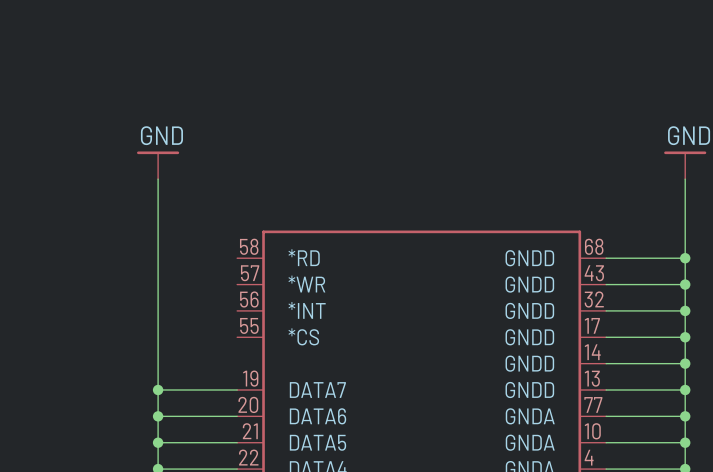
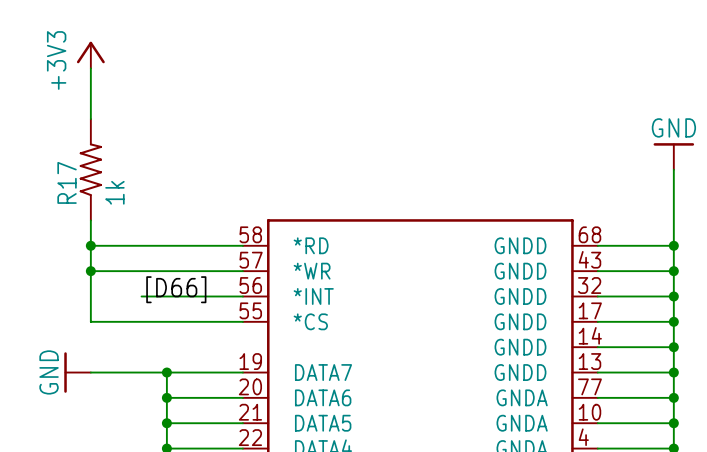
power symbol: none -> +3V3 (90, 55)
wire: none -> (90, 68) (90, 119)
power symbol rotation: 0° (158, 152) -> 90° counterclockwise (65, 372)
power symbol position: GND (158, 165) -> GND (77, 372)
R17: none -> 1k (90, 169)
wire: (158, 179) (158, 390) -> (90, 372) (166, 372)
wire: none -> (90, 220) (90, 321) (242, 321)
wire: none -> (90, 245) (242, 245)
junction: none -> (90, 245)
wire: none -> (90, 271) (242, 271)
junction: none -> (90, 271)
label: none -> [D66] (176, 289)
wire: none -> (141, 296) (242, 296)

